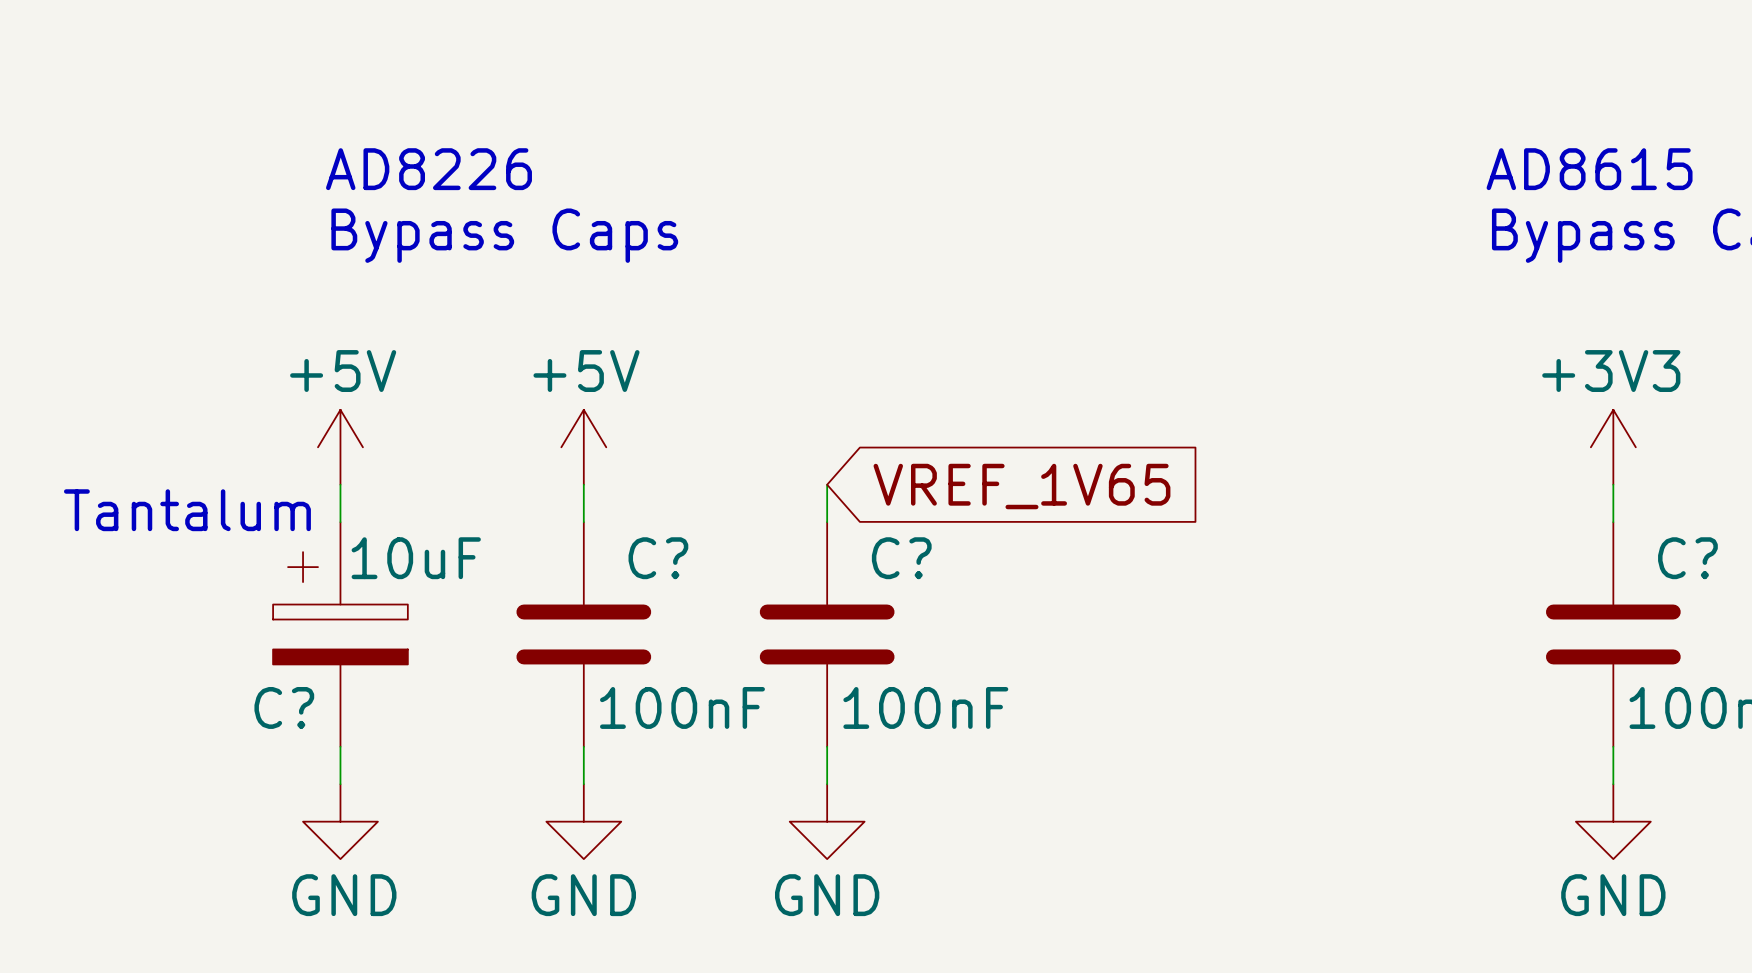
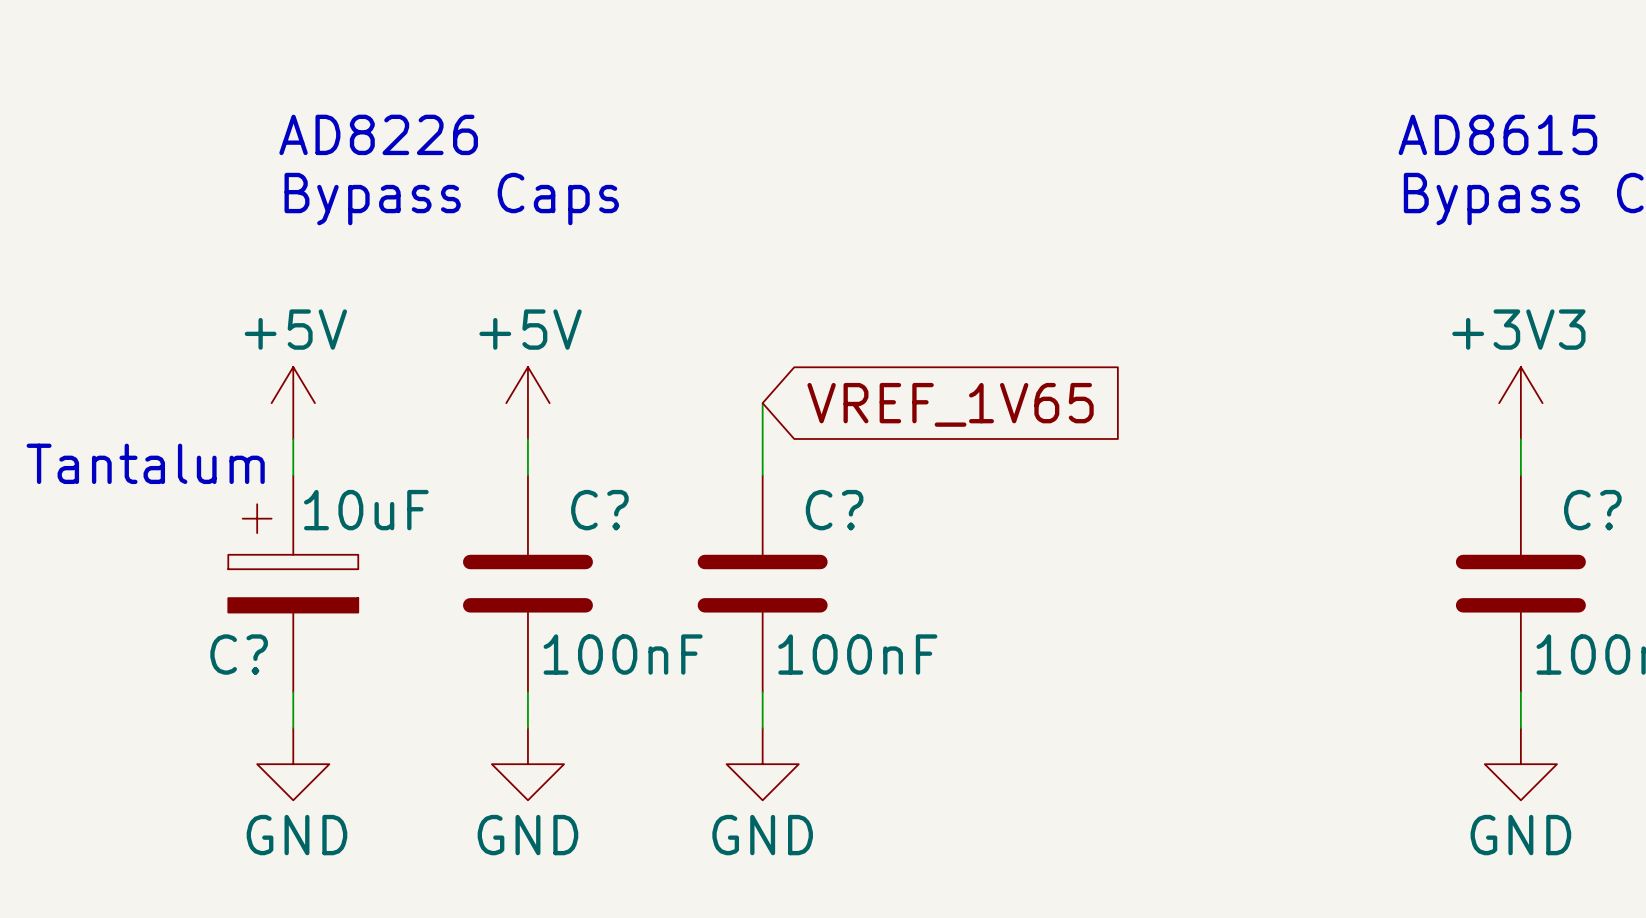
wire: none -> (762, 403) (762, 439)
global label position: VREF_1V65 (1021, 486) -> VREF_1V65 (950, 404)

